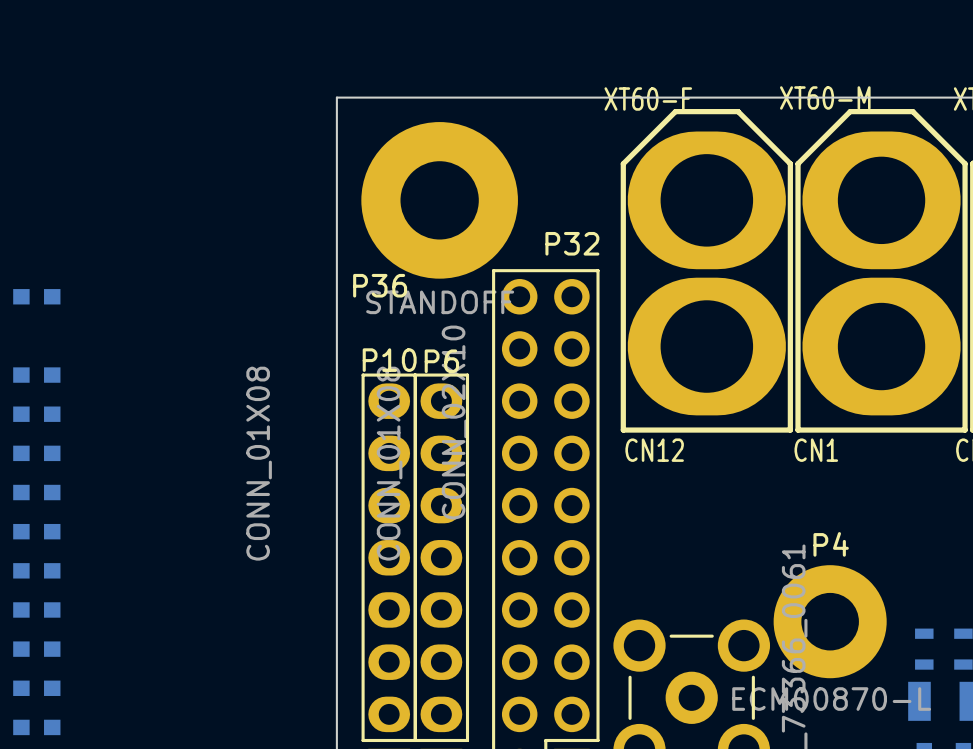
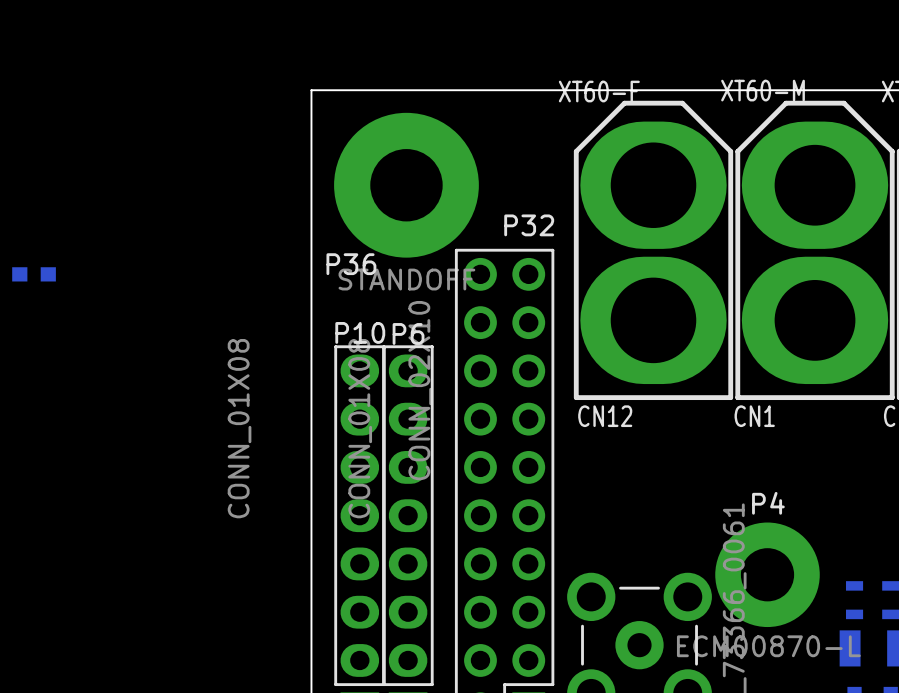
part: (36, 375) -> none
part: (36, 414) -> none
part: (36, 453) -> none
part: (36, 492) -> none
part: (36, 531) -> none
part: (36, 570) -> none
part: (36, 609) -> none
part: (36, 649) -> none
part: (36, 688) -> none
part: (36, 727) -> none

